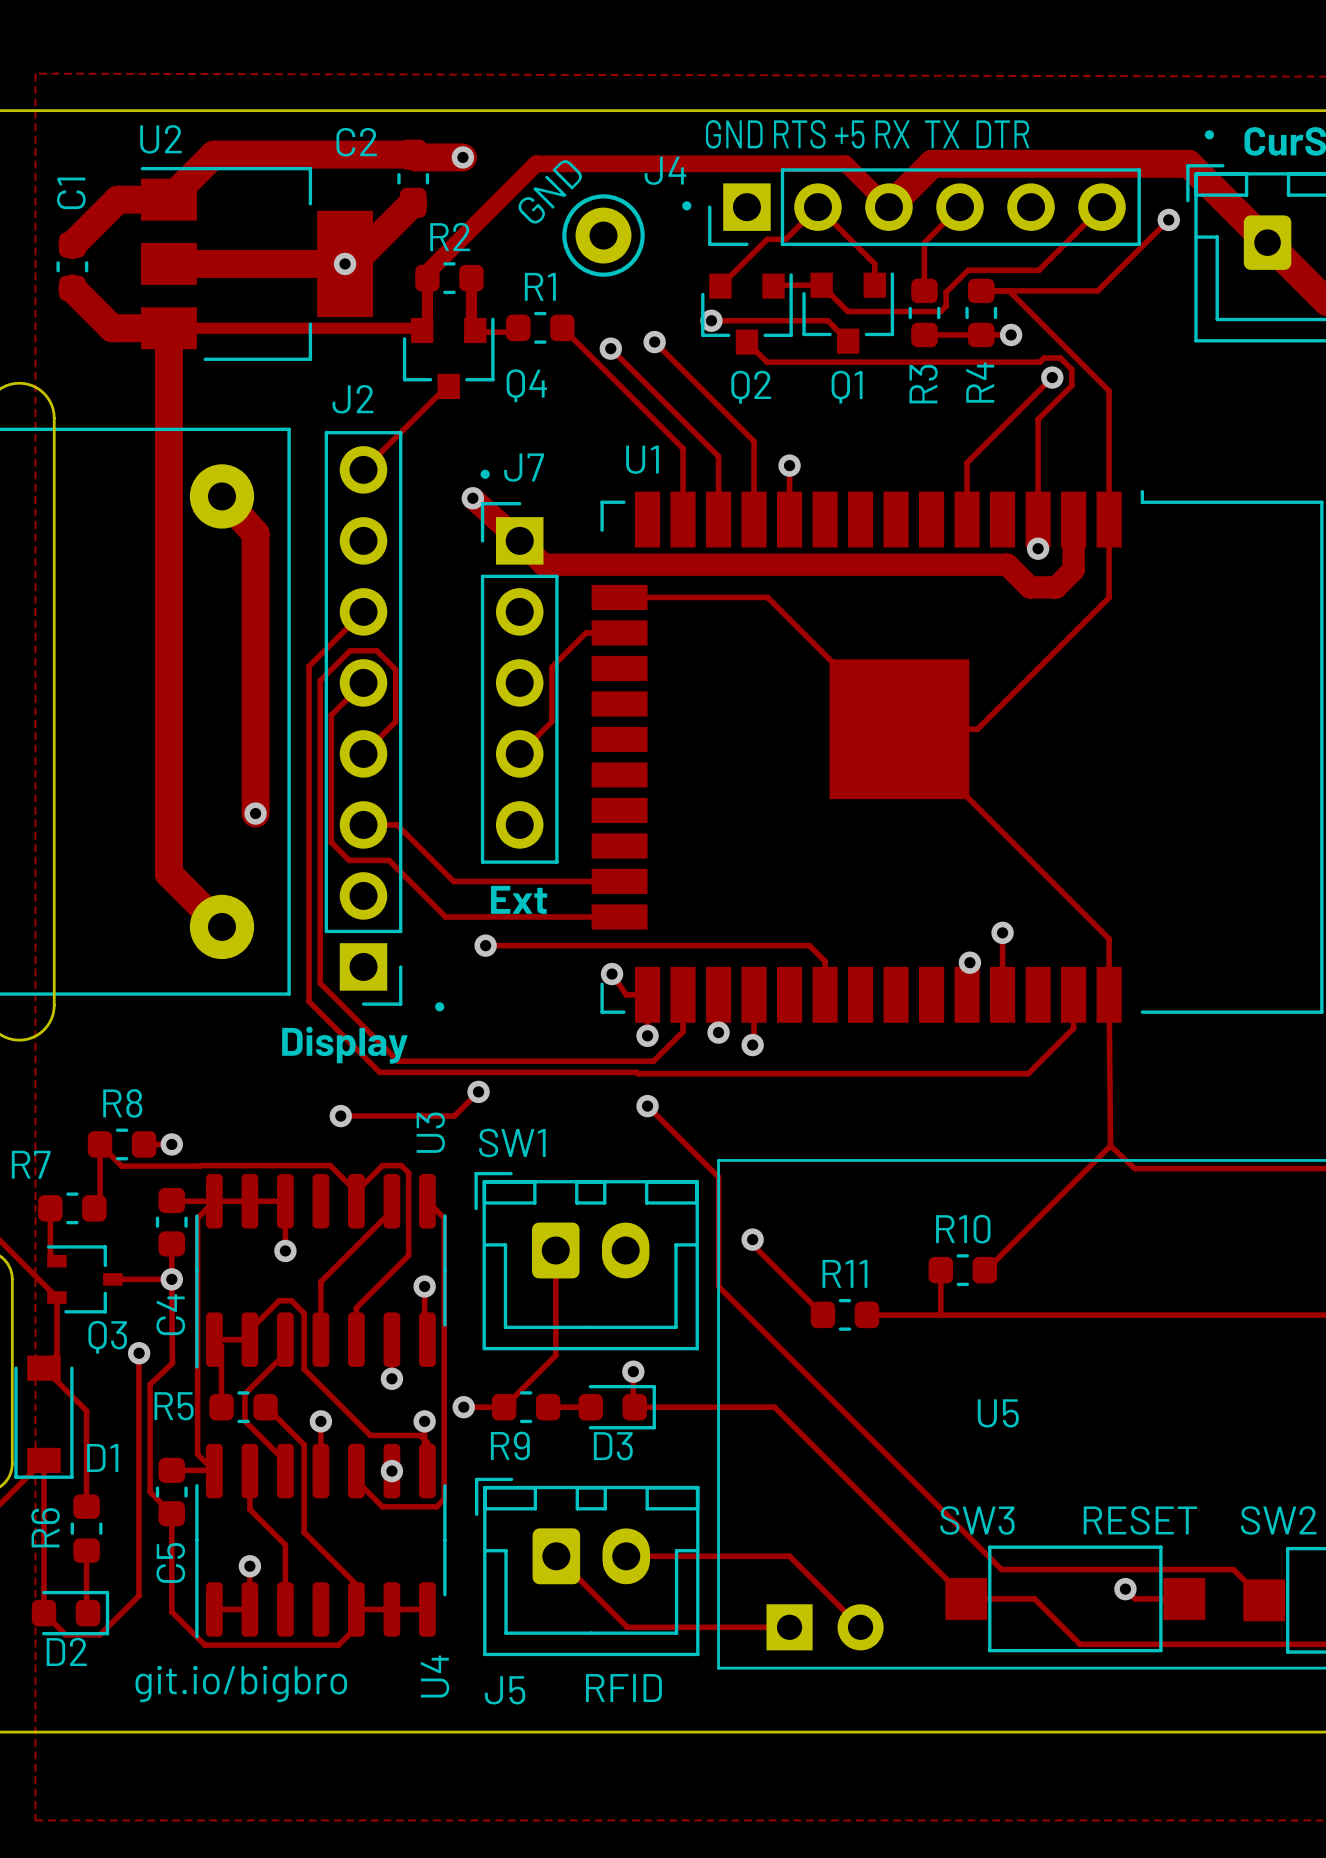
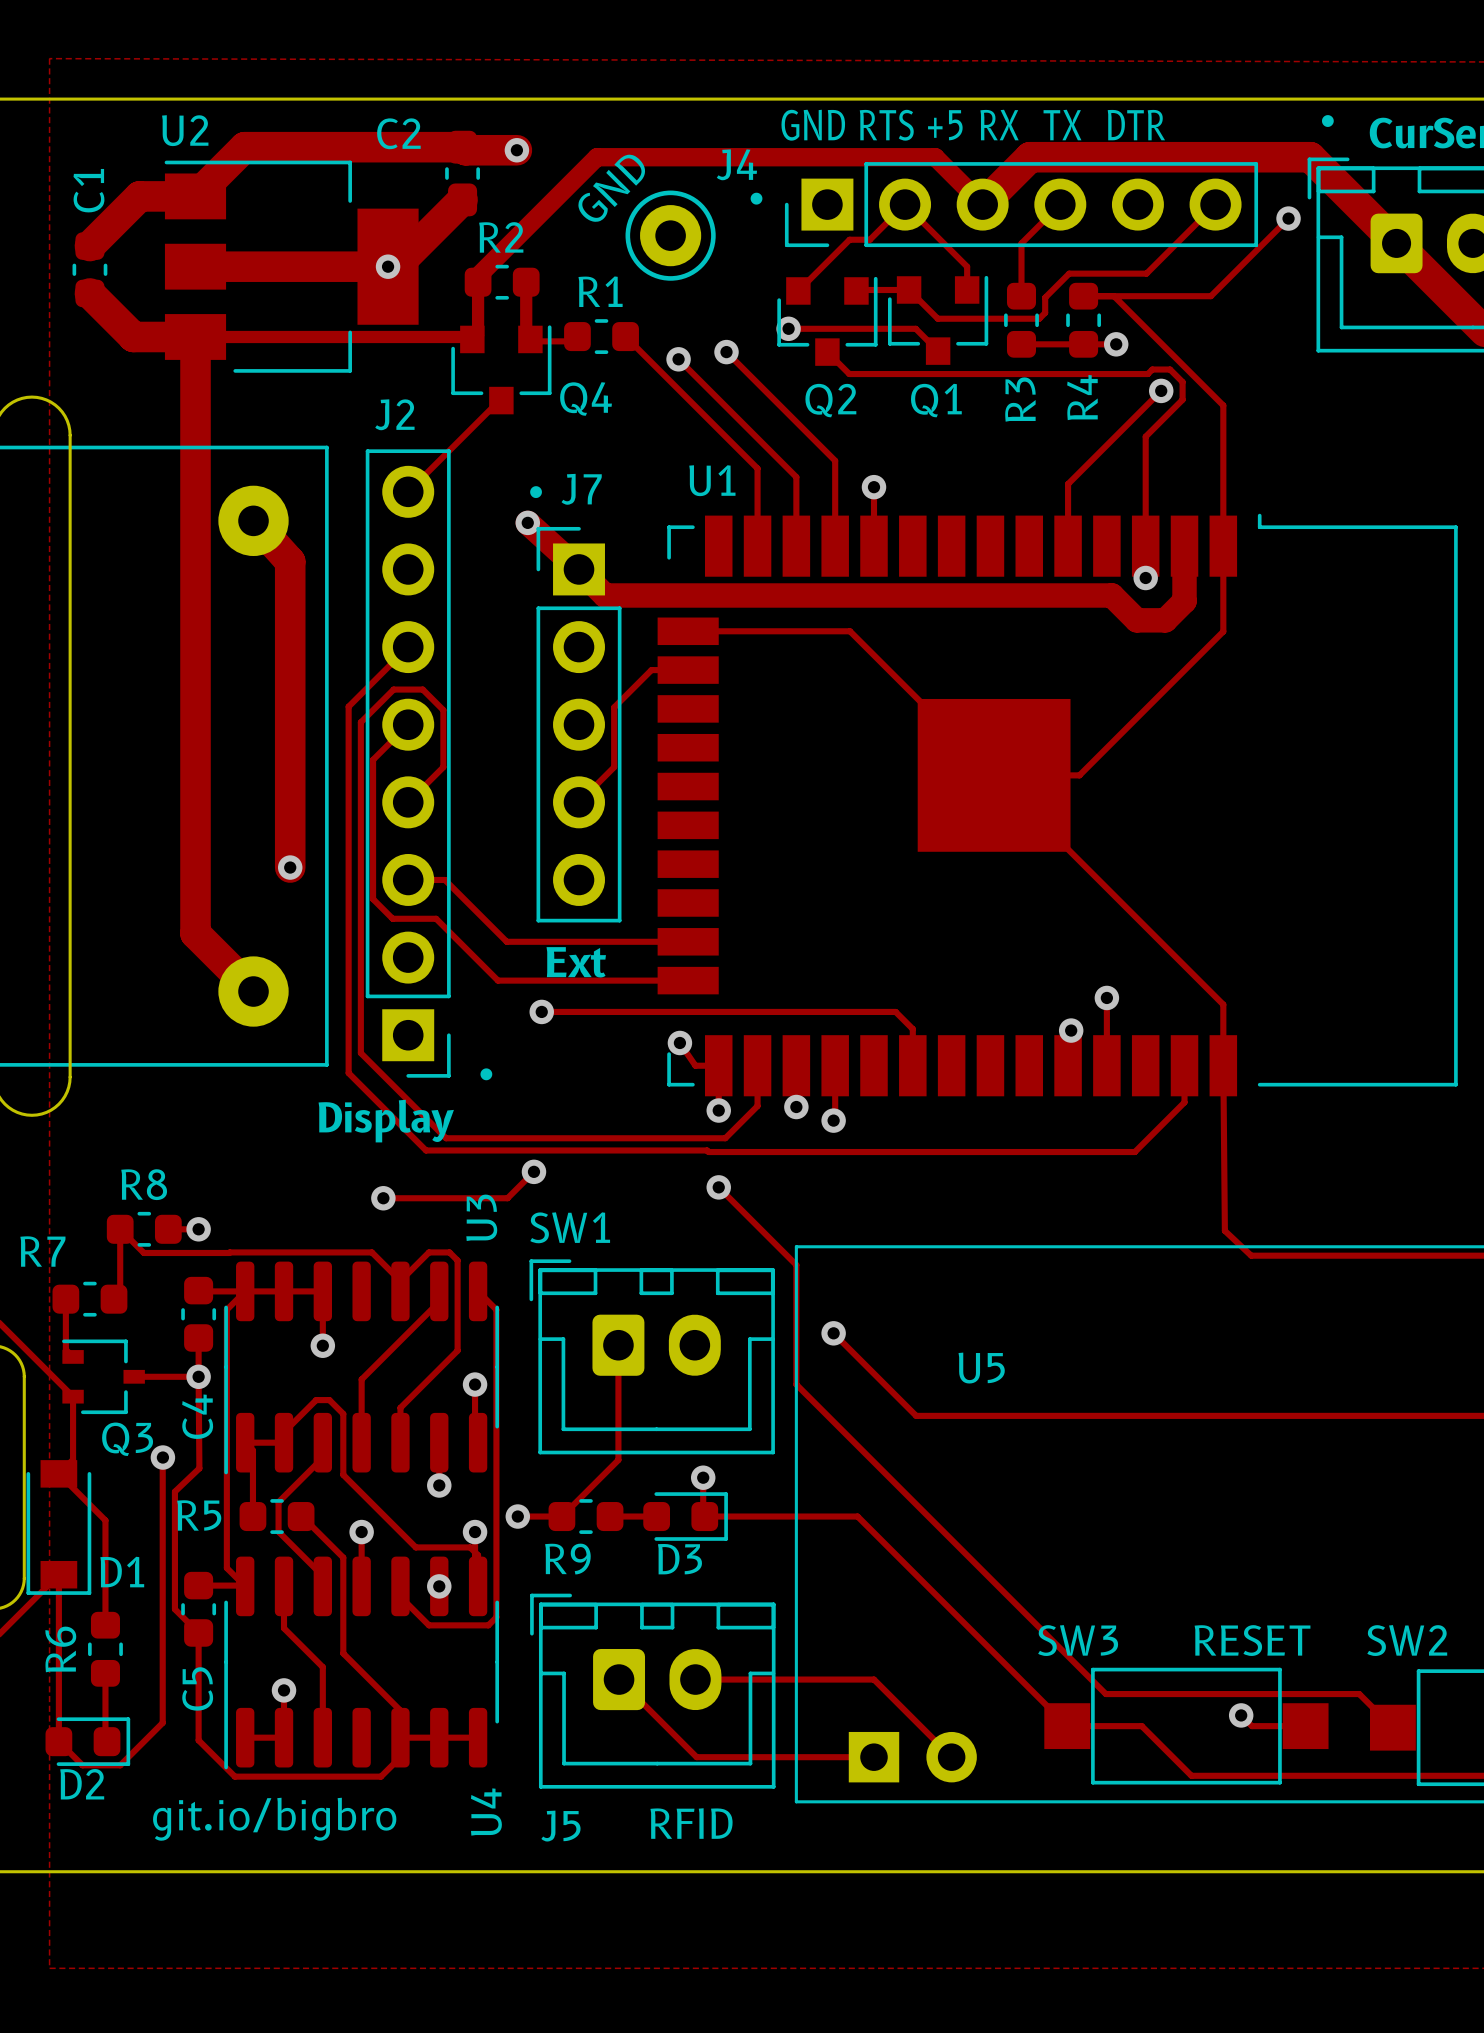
track: (1110, 1145) (984, 1270) -> none
track: (752, 1239) (752, 1244) (822, 1314) -> (833, 1333) (916, 1415) (958, 1415)
track: (940, 1270) (940, 1315) -> none
R10: (962, 1270) -> none
R11: (844, 1314) -> none
U5 name position: U5 (998, 1413) -> U5 (981, 1368)

